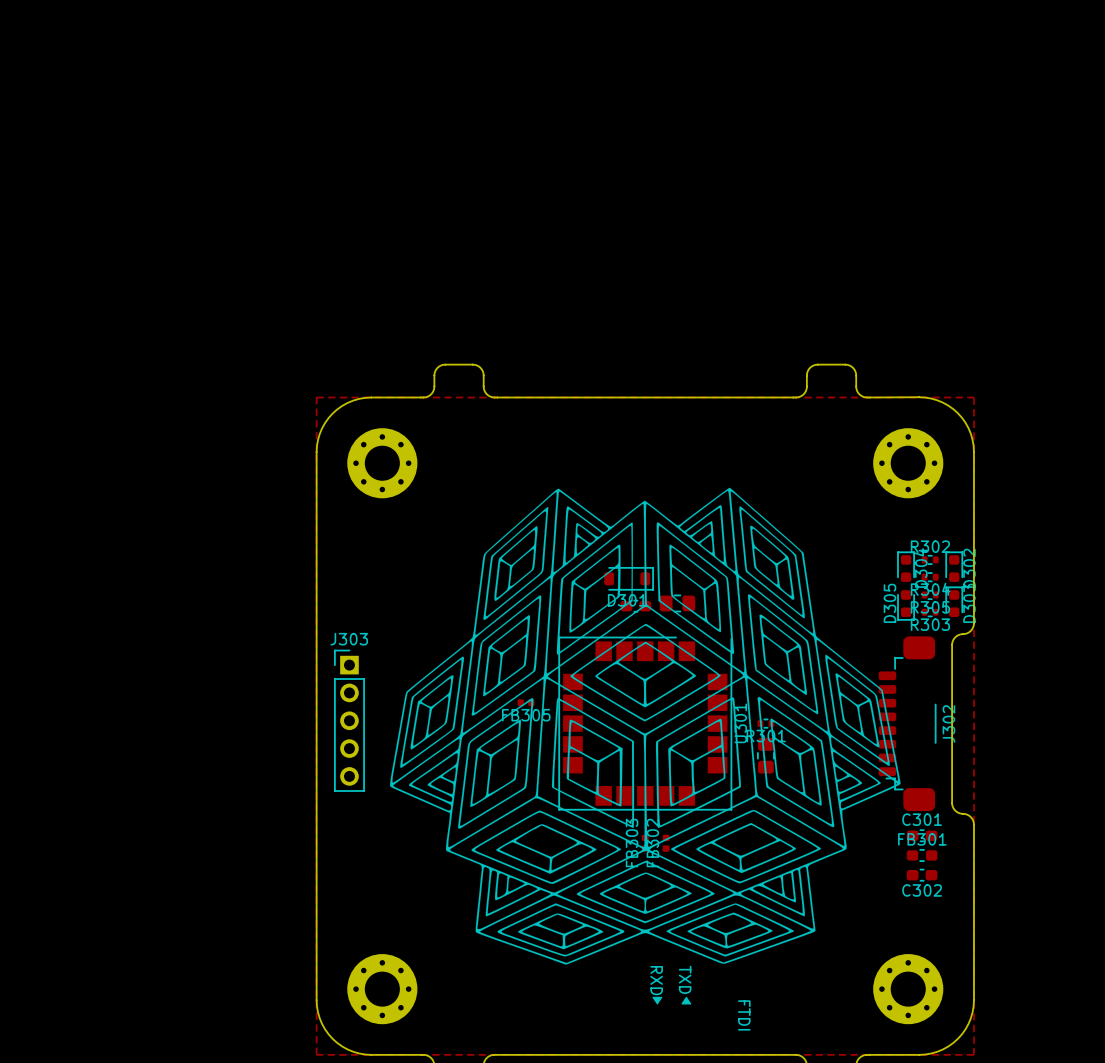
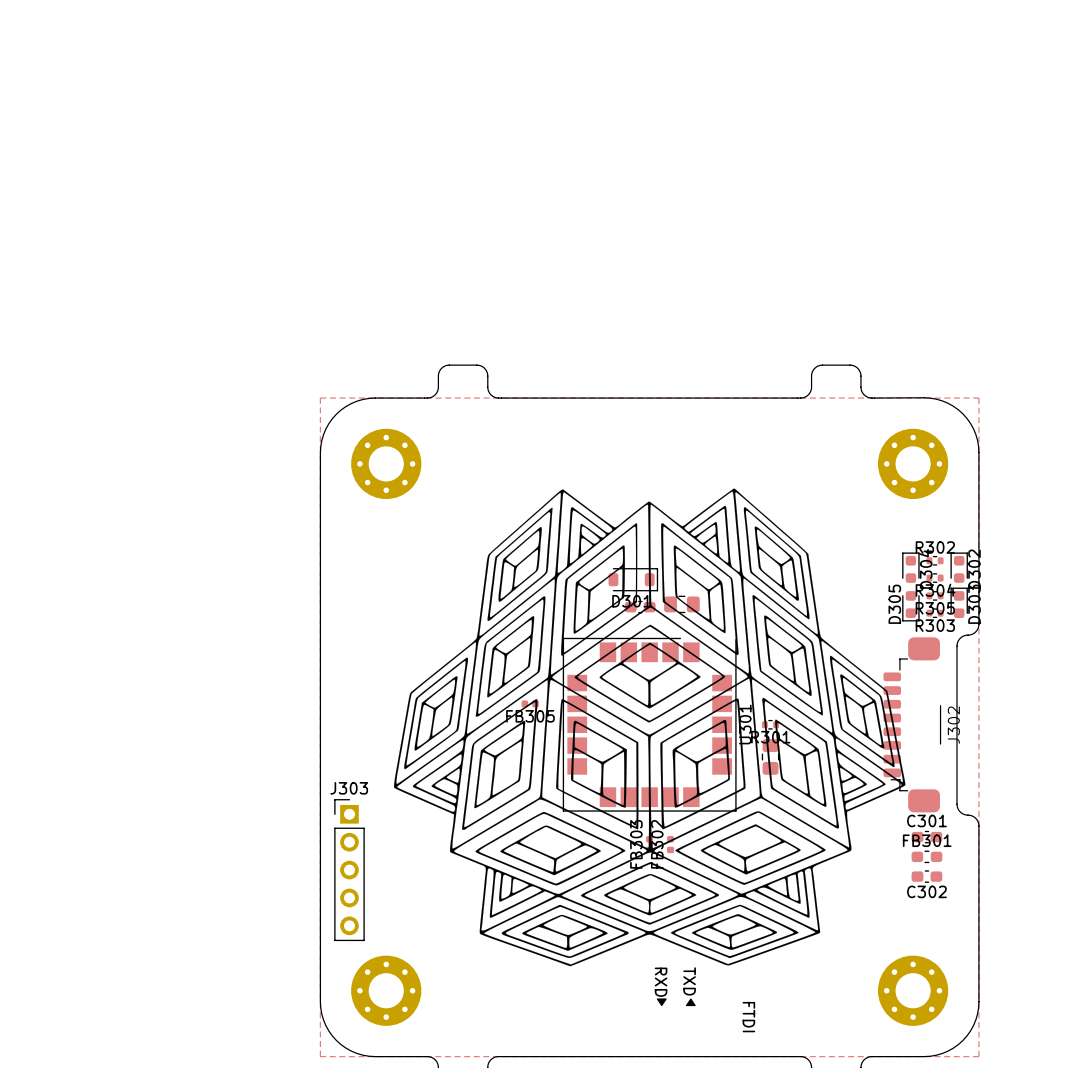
J303 position: (349, 720) -> (349, 870)

